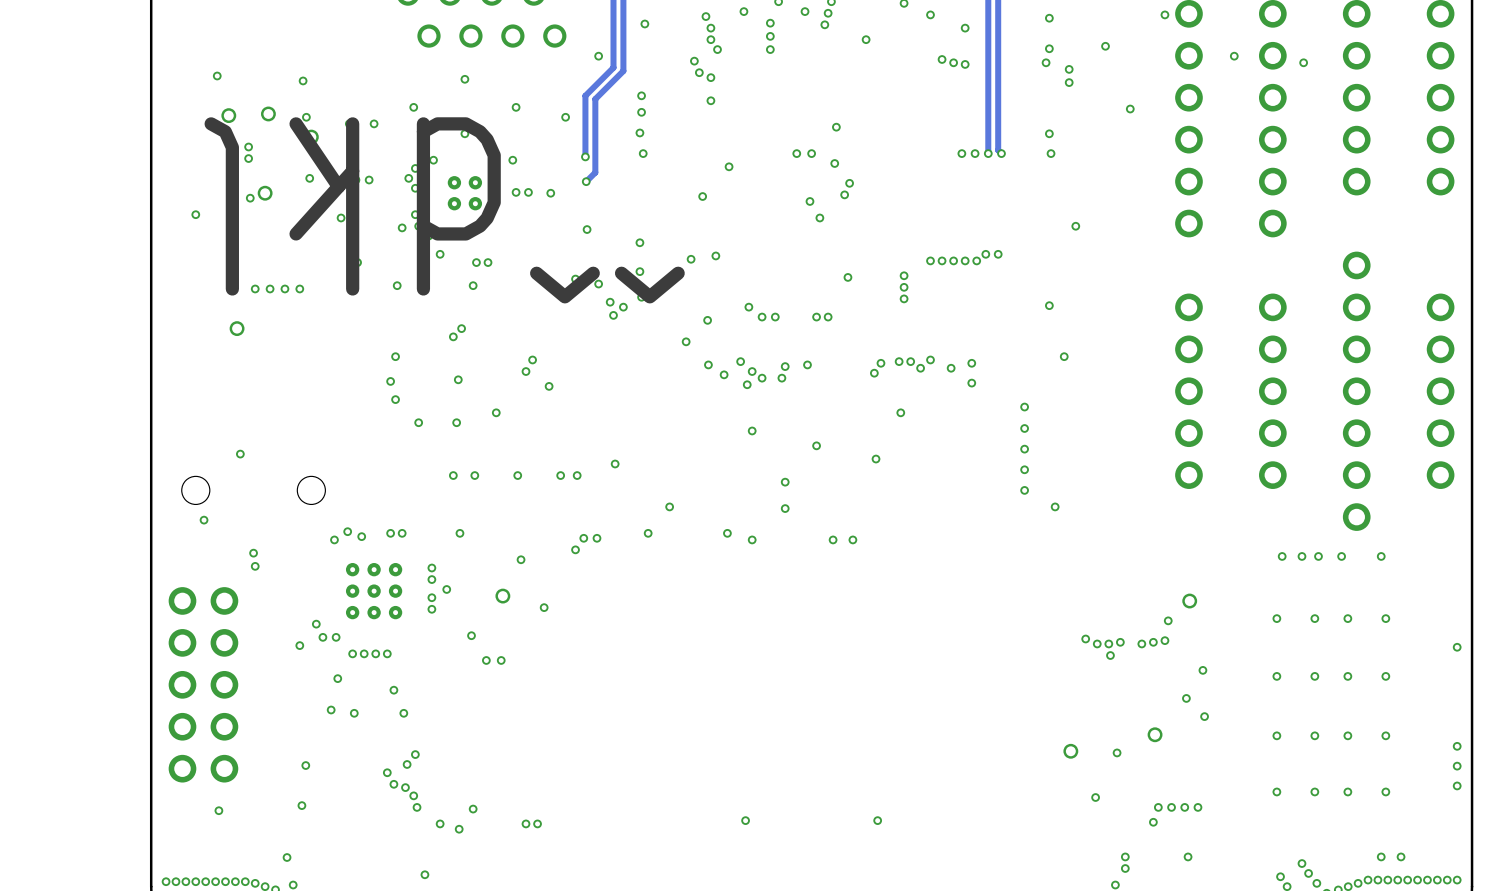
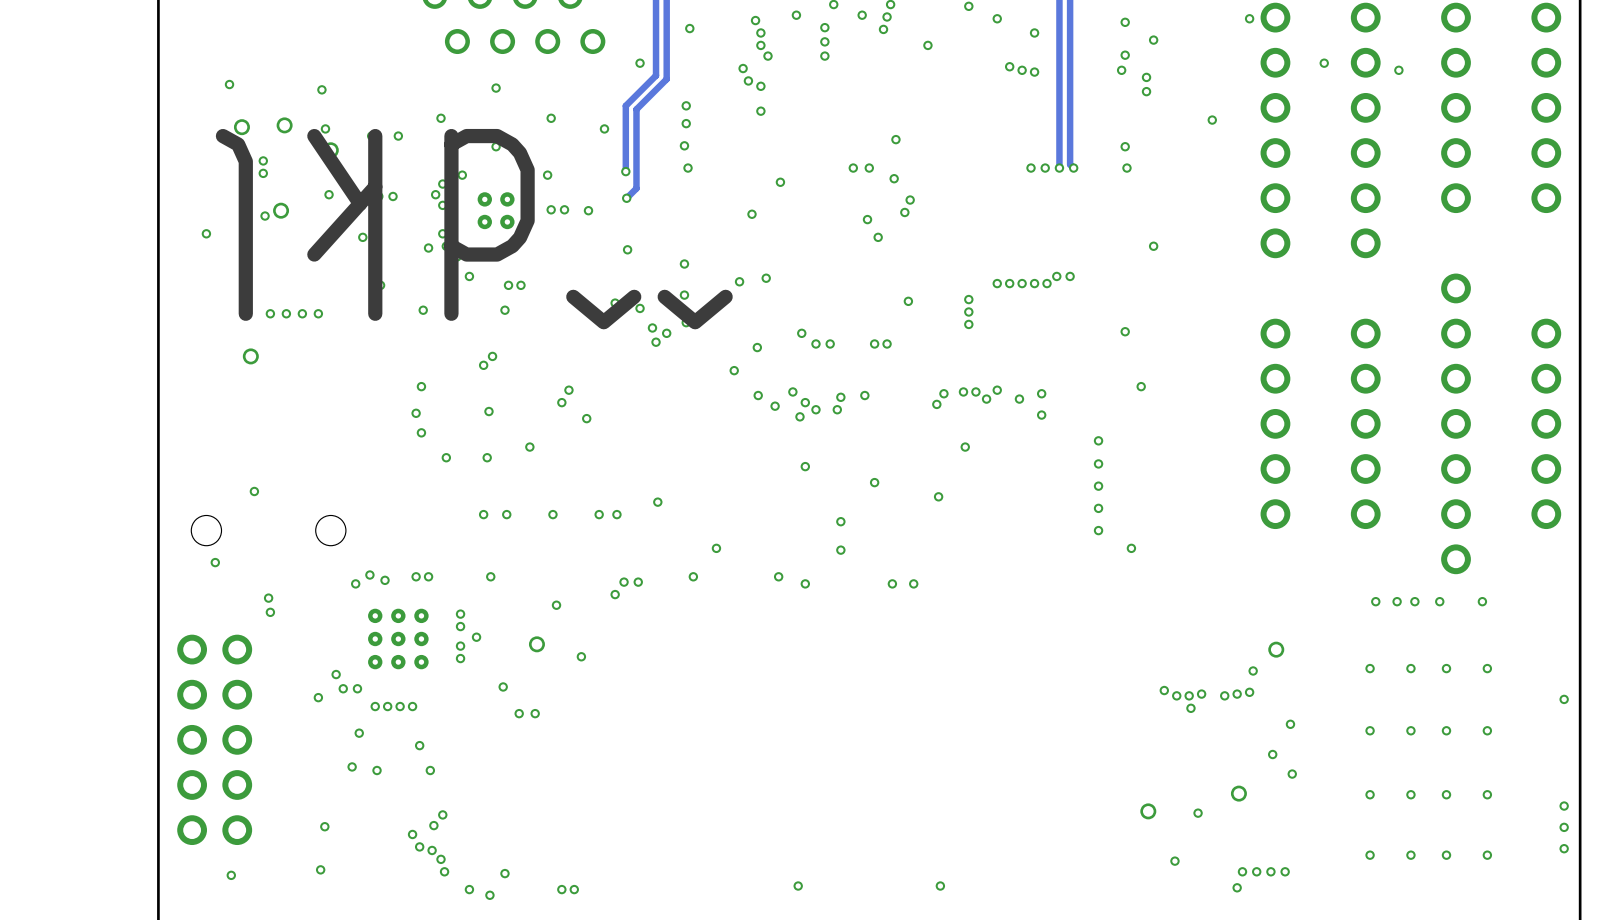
via: none -> (1153, 40)
via: (1105, 46) -> none

